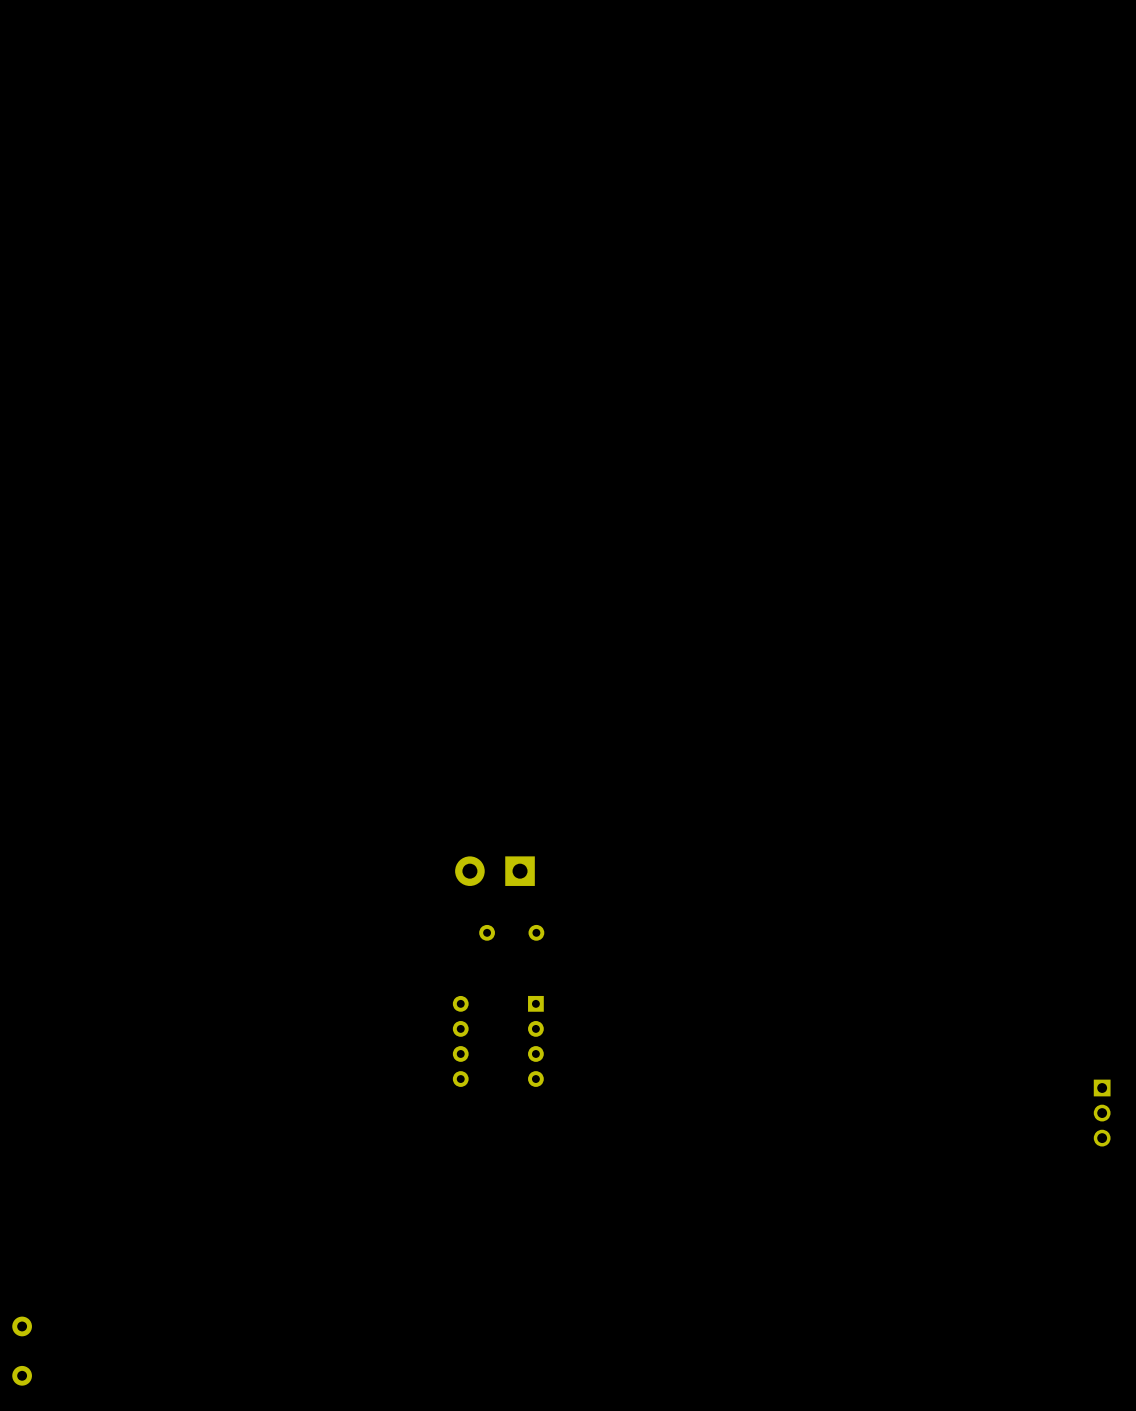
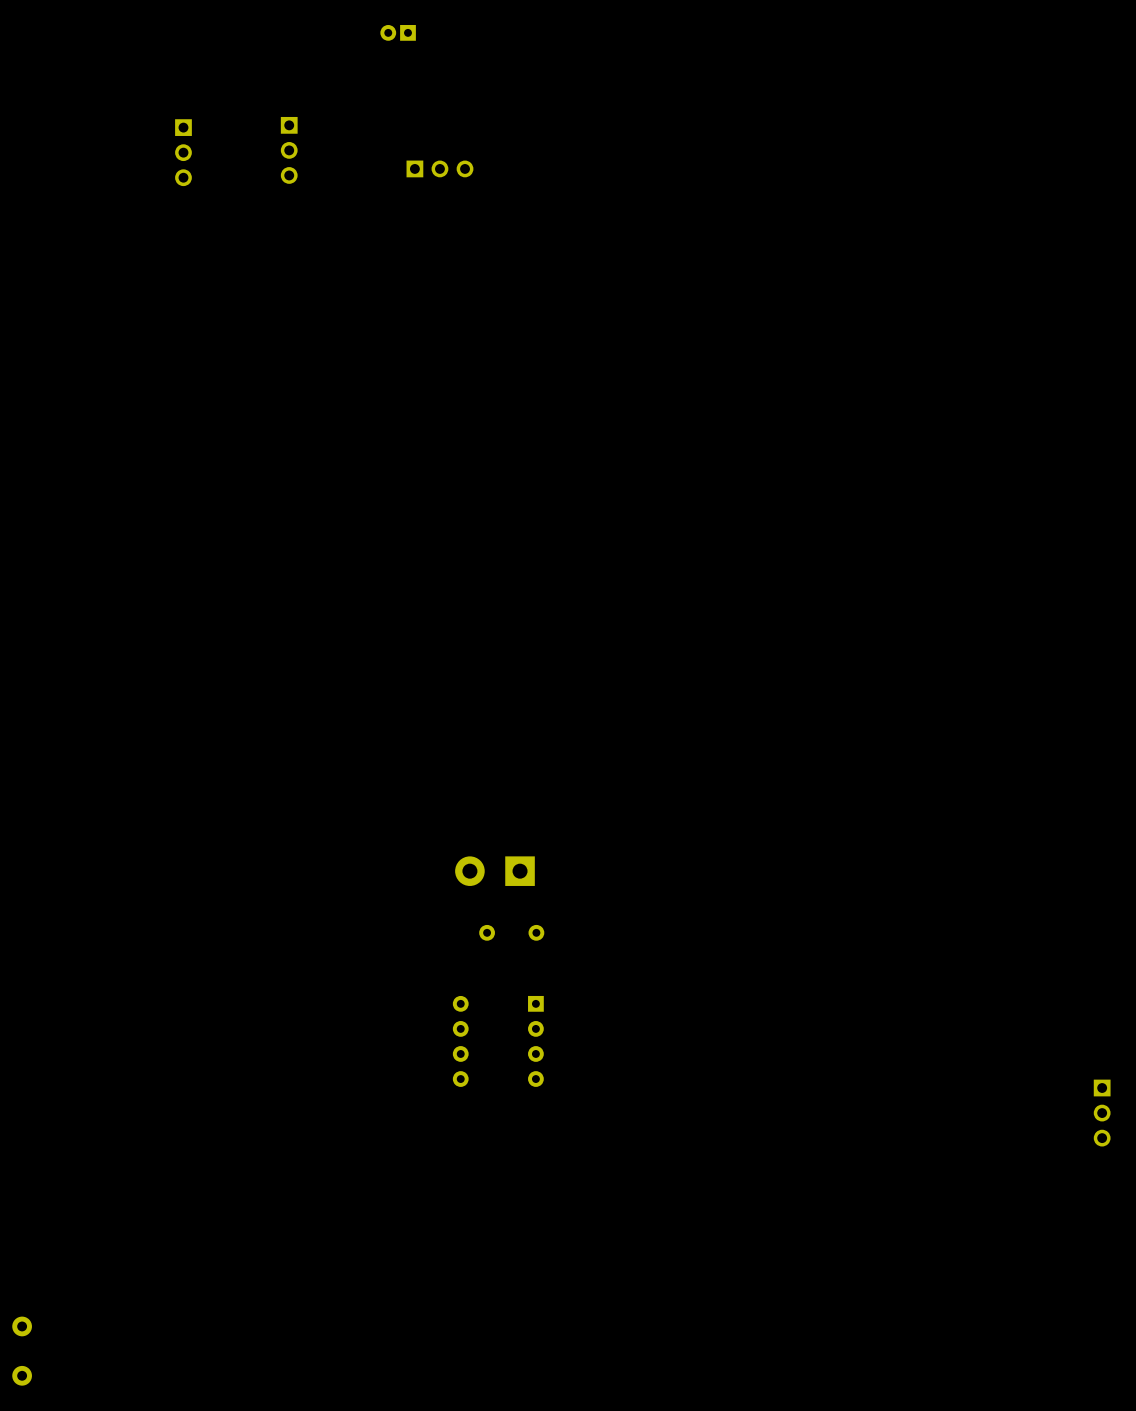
part: none -> (398, 32)
part: none -> (289, 150)
part: none -> (183, 152)
part: none -> (439, 168)

